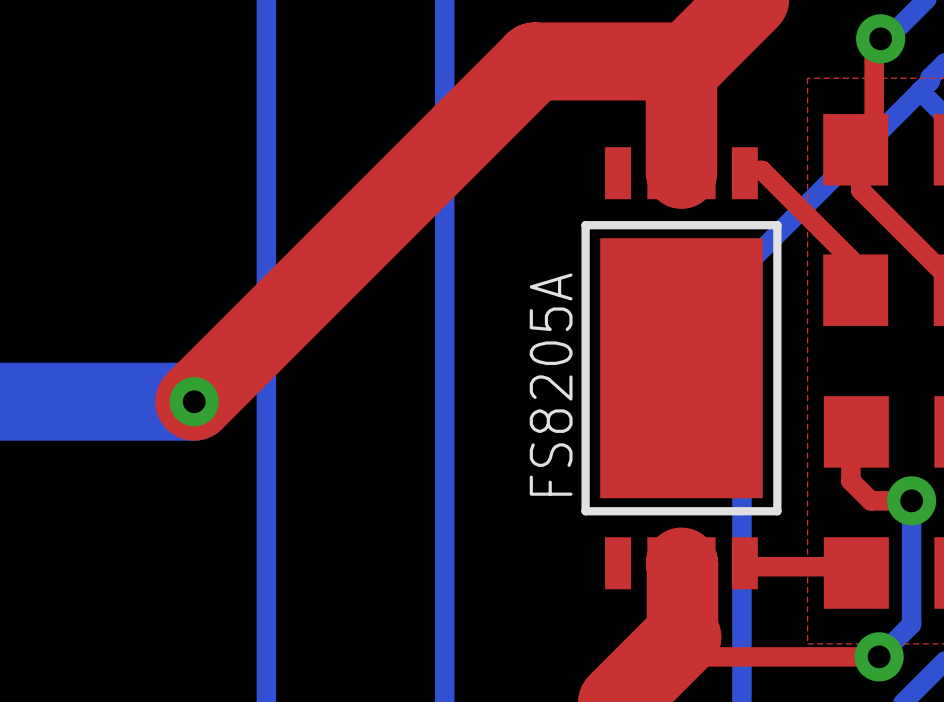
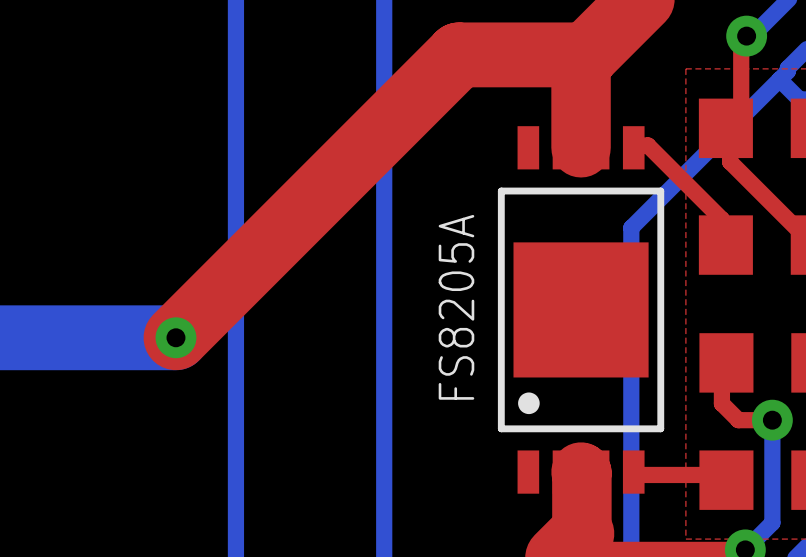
part: (681, 368) -> none
FS8205A: none -> (581, 309)

